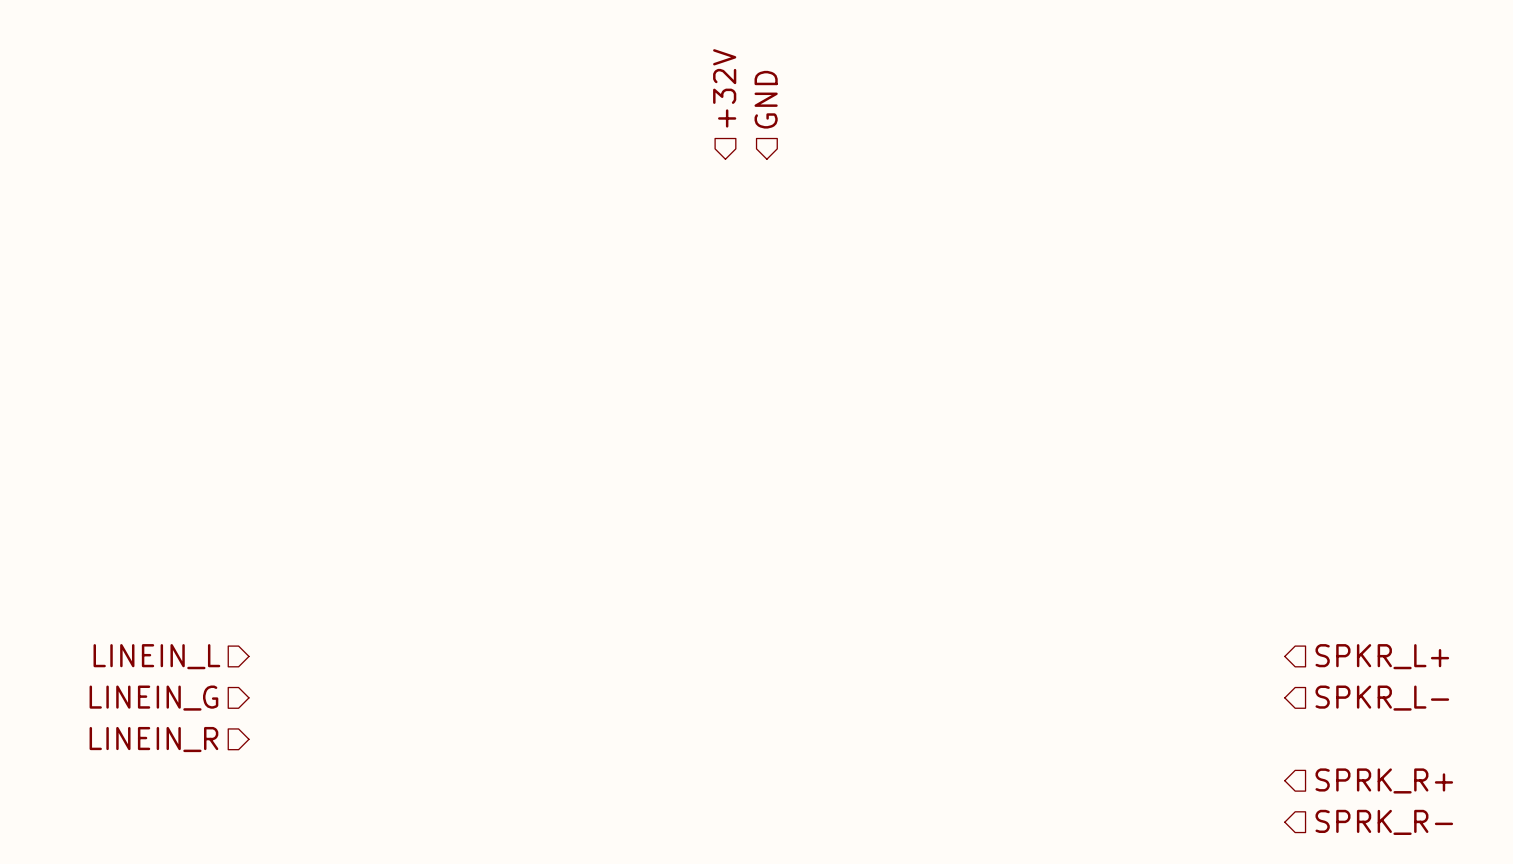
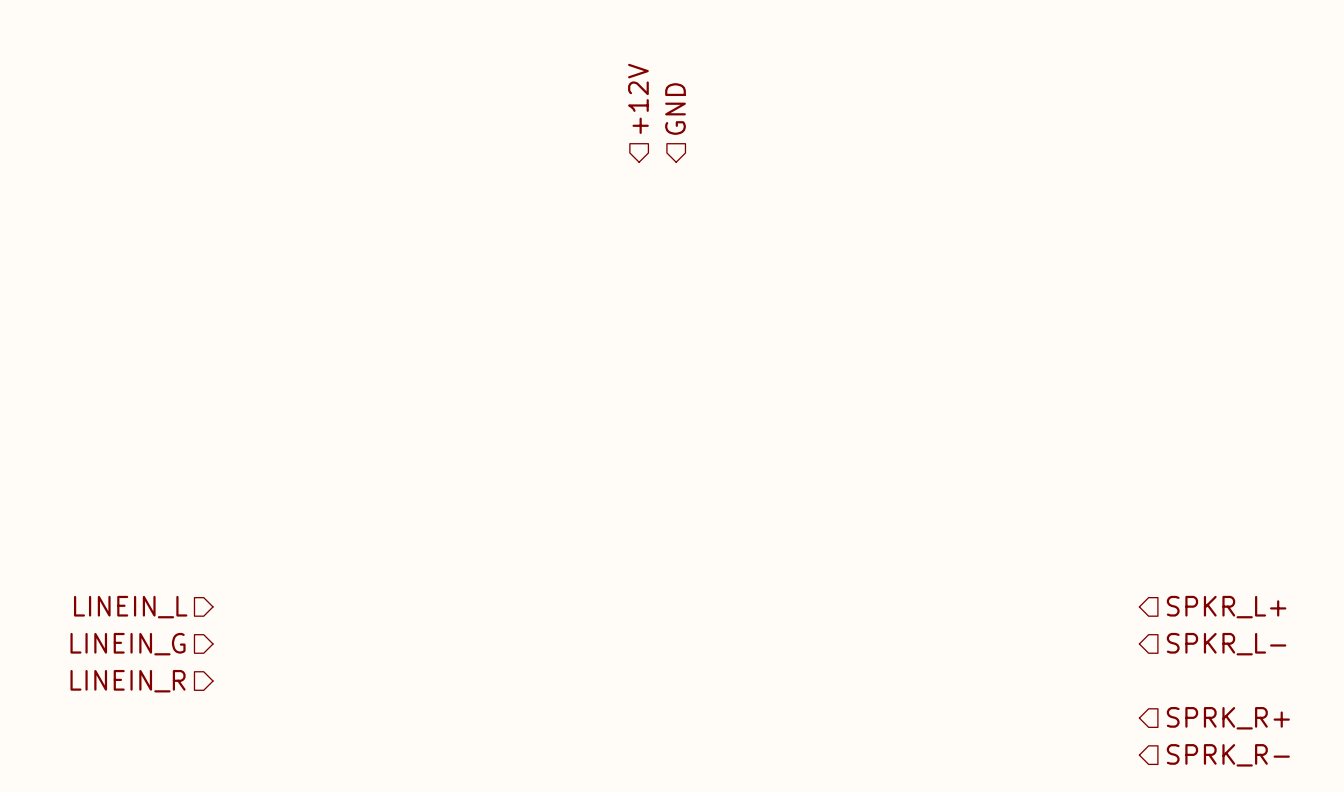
hierarchical label: +32V (724, 88) -> +12V (638, 98)

